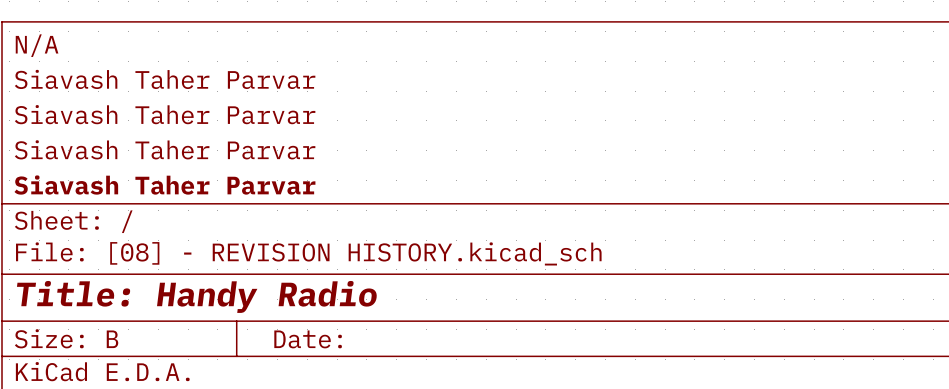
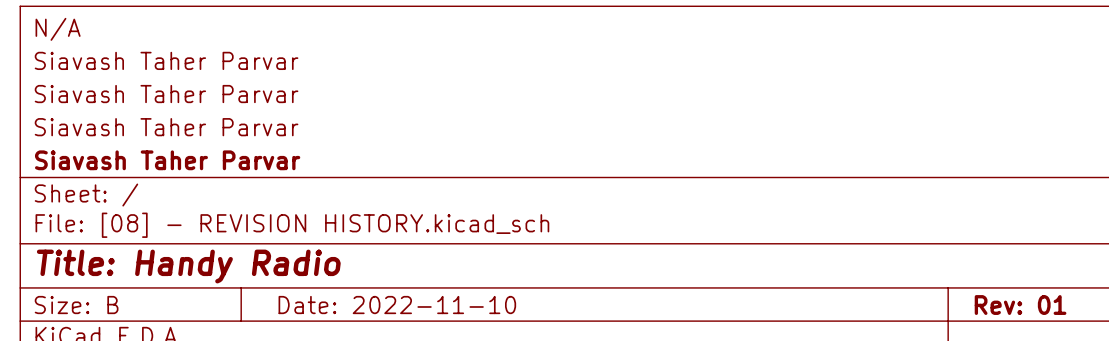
title block: Date: (308, 339) -> Date: 2022-11-10 (397, 305)

